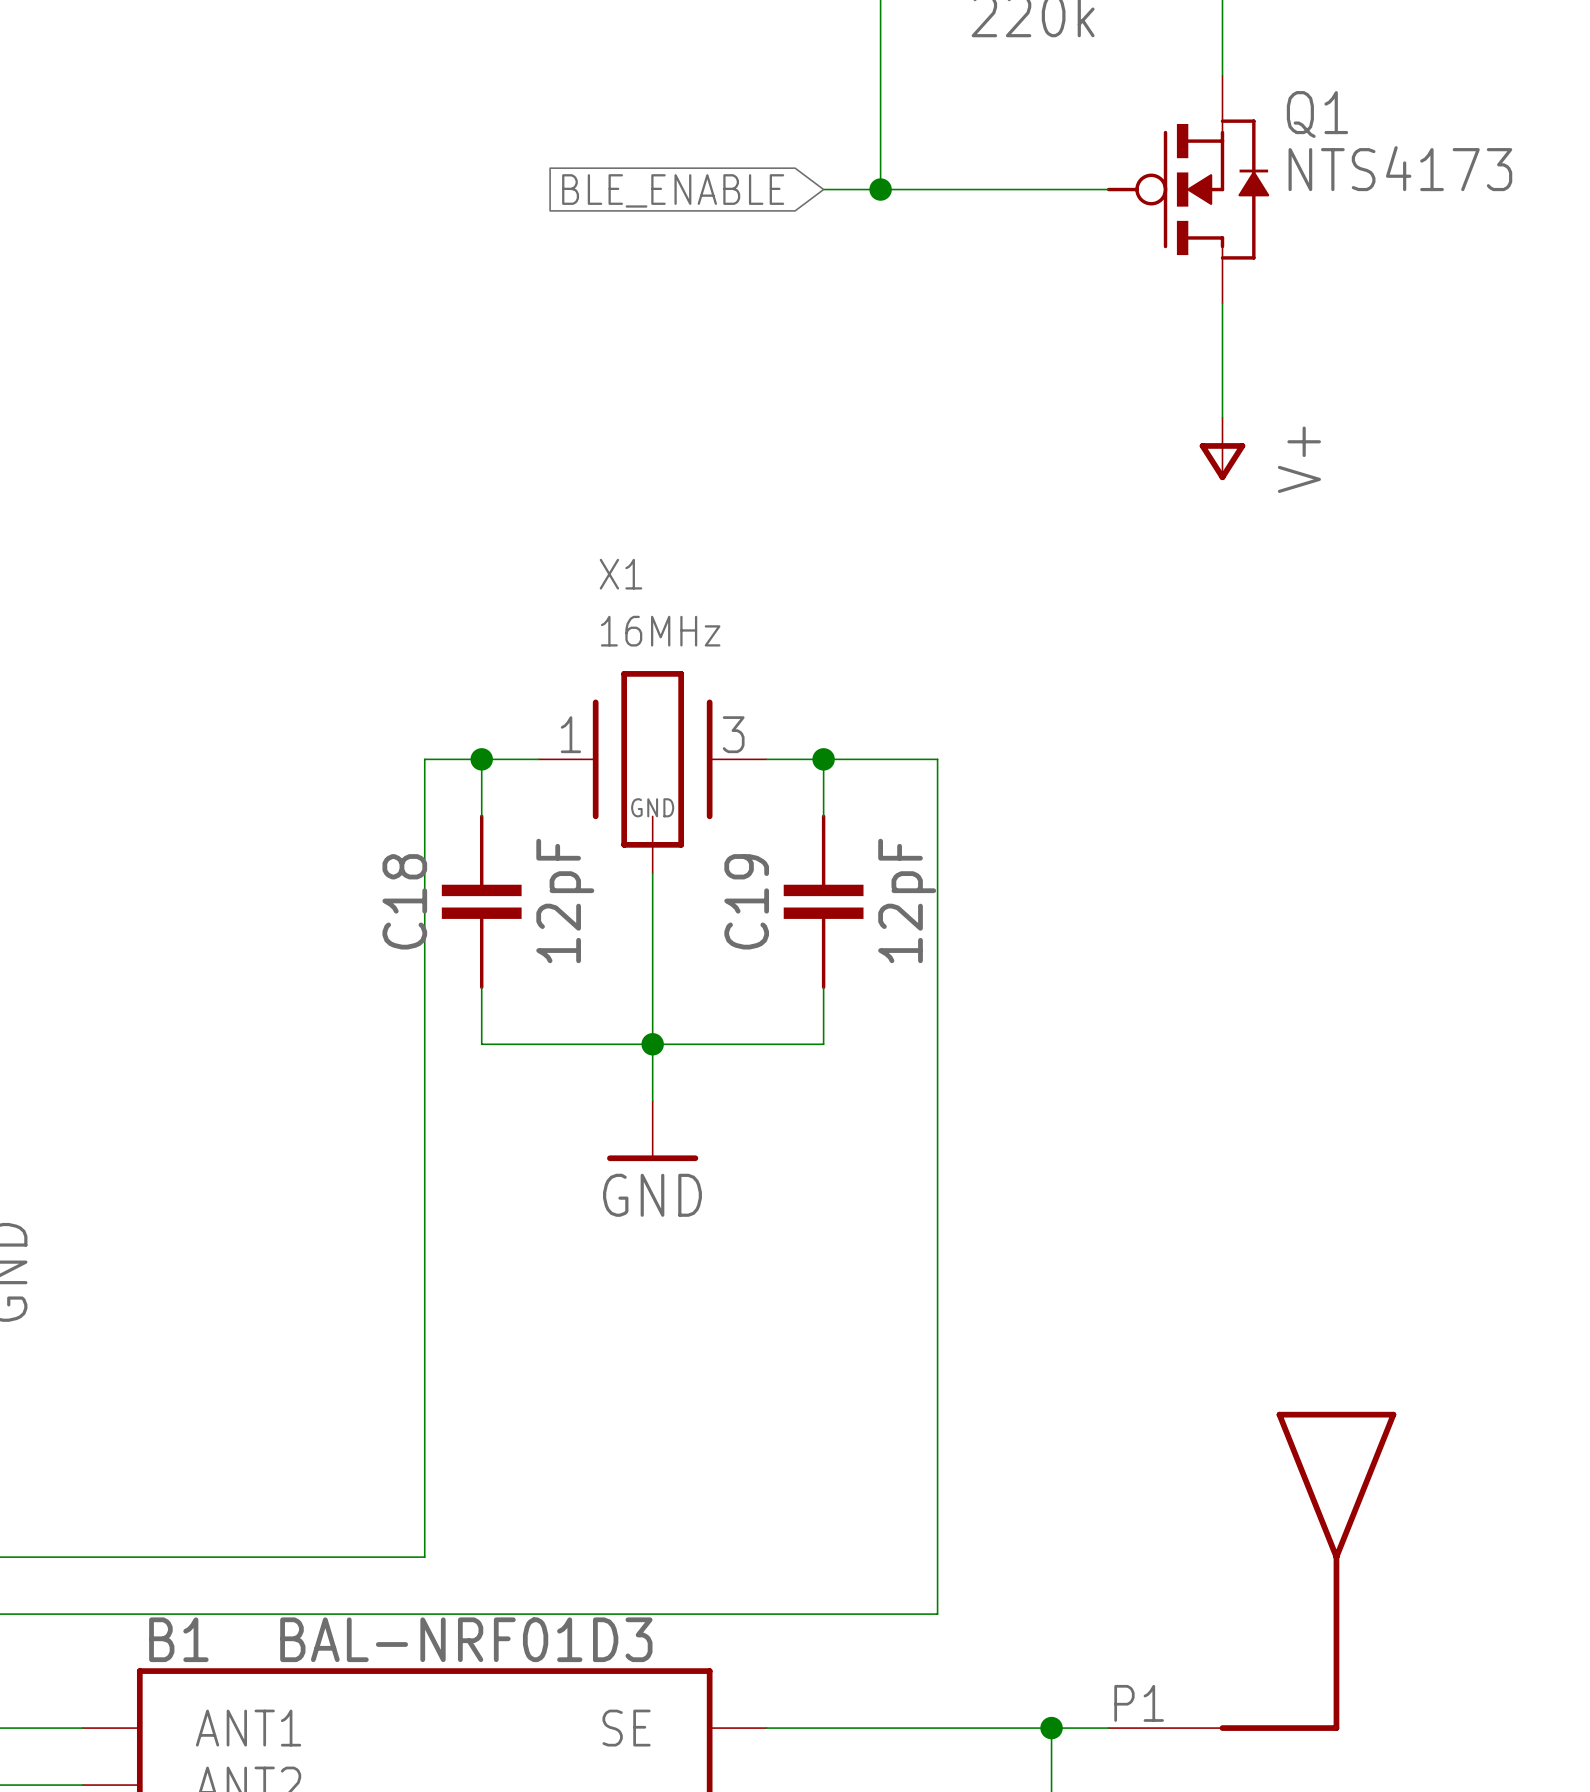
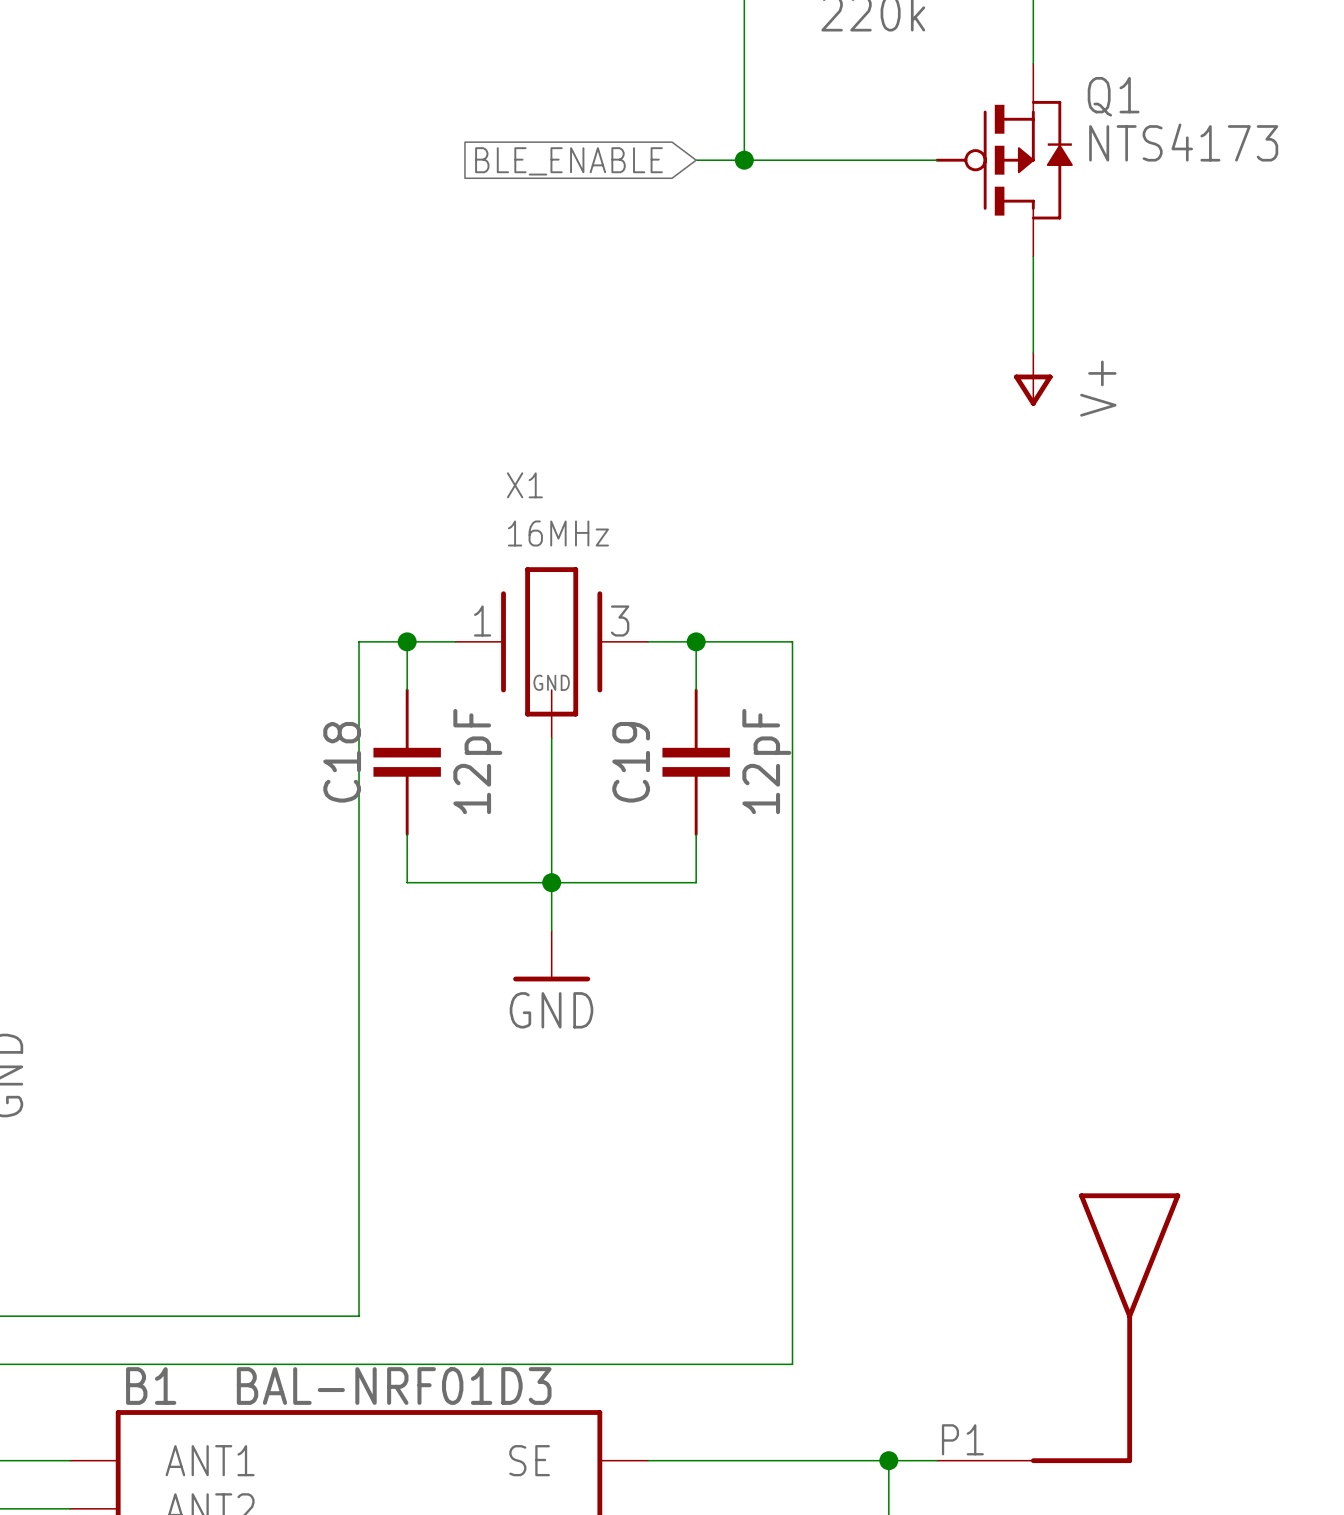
Q1 symbol: [1106, 75, 1270, 304] -> [935, 63, 1073, 257]

